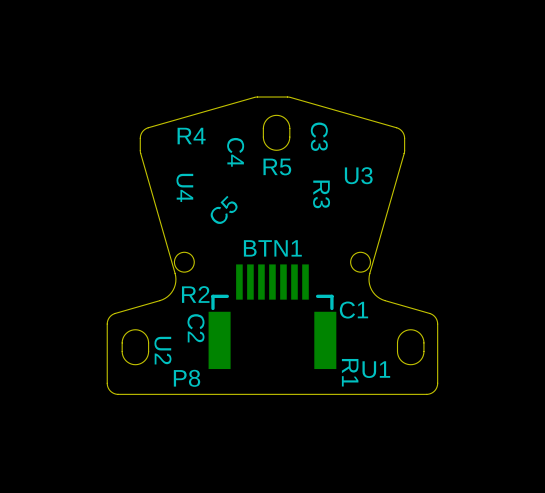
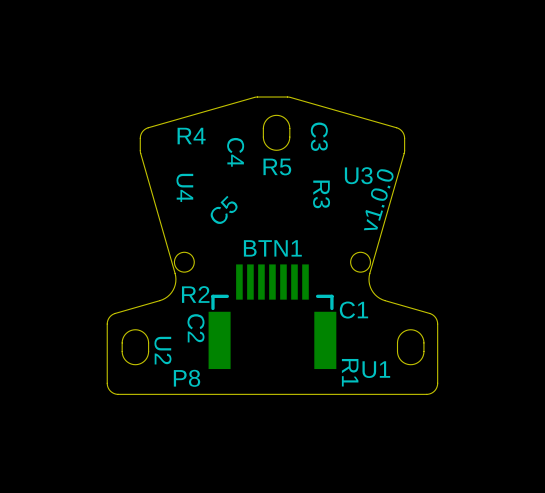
text: none -> v1.0.0 (378, 199)

